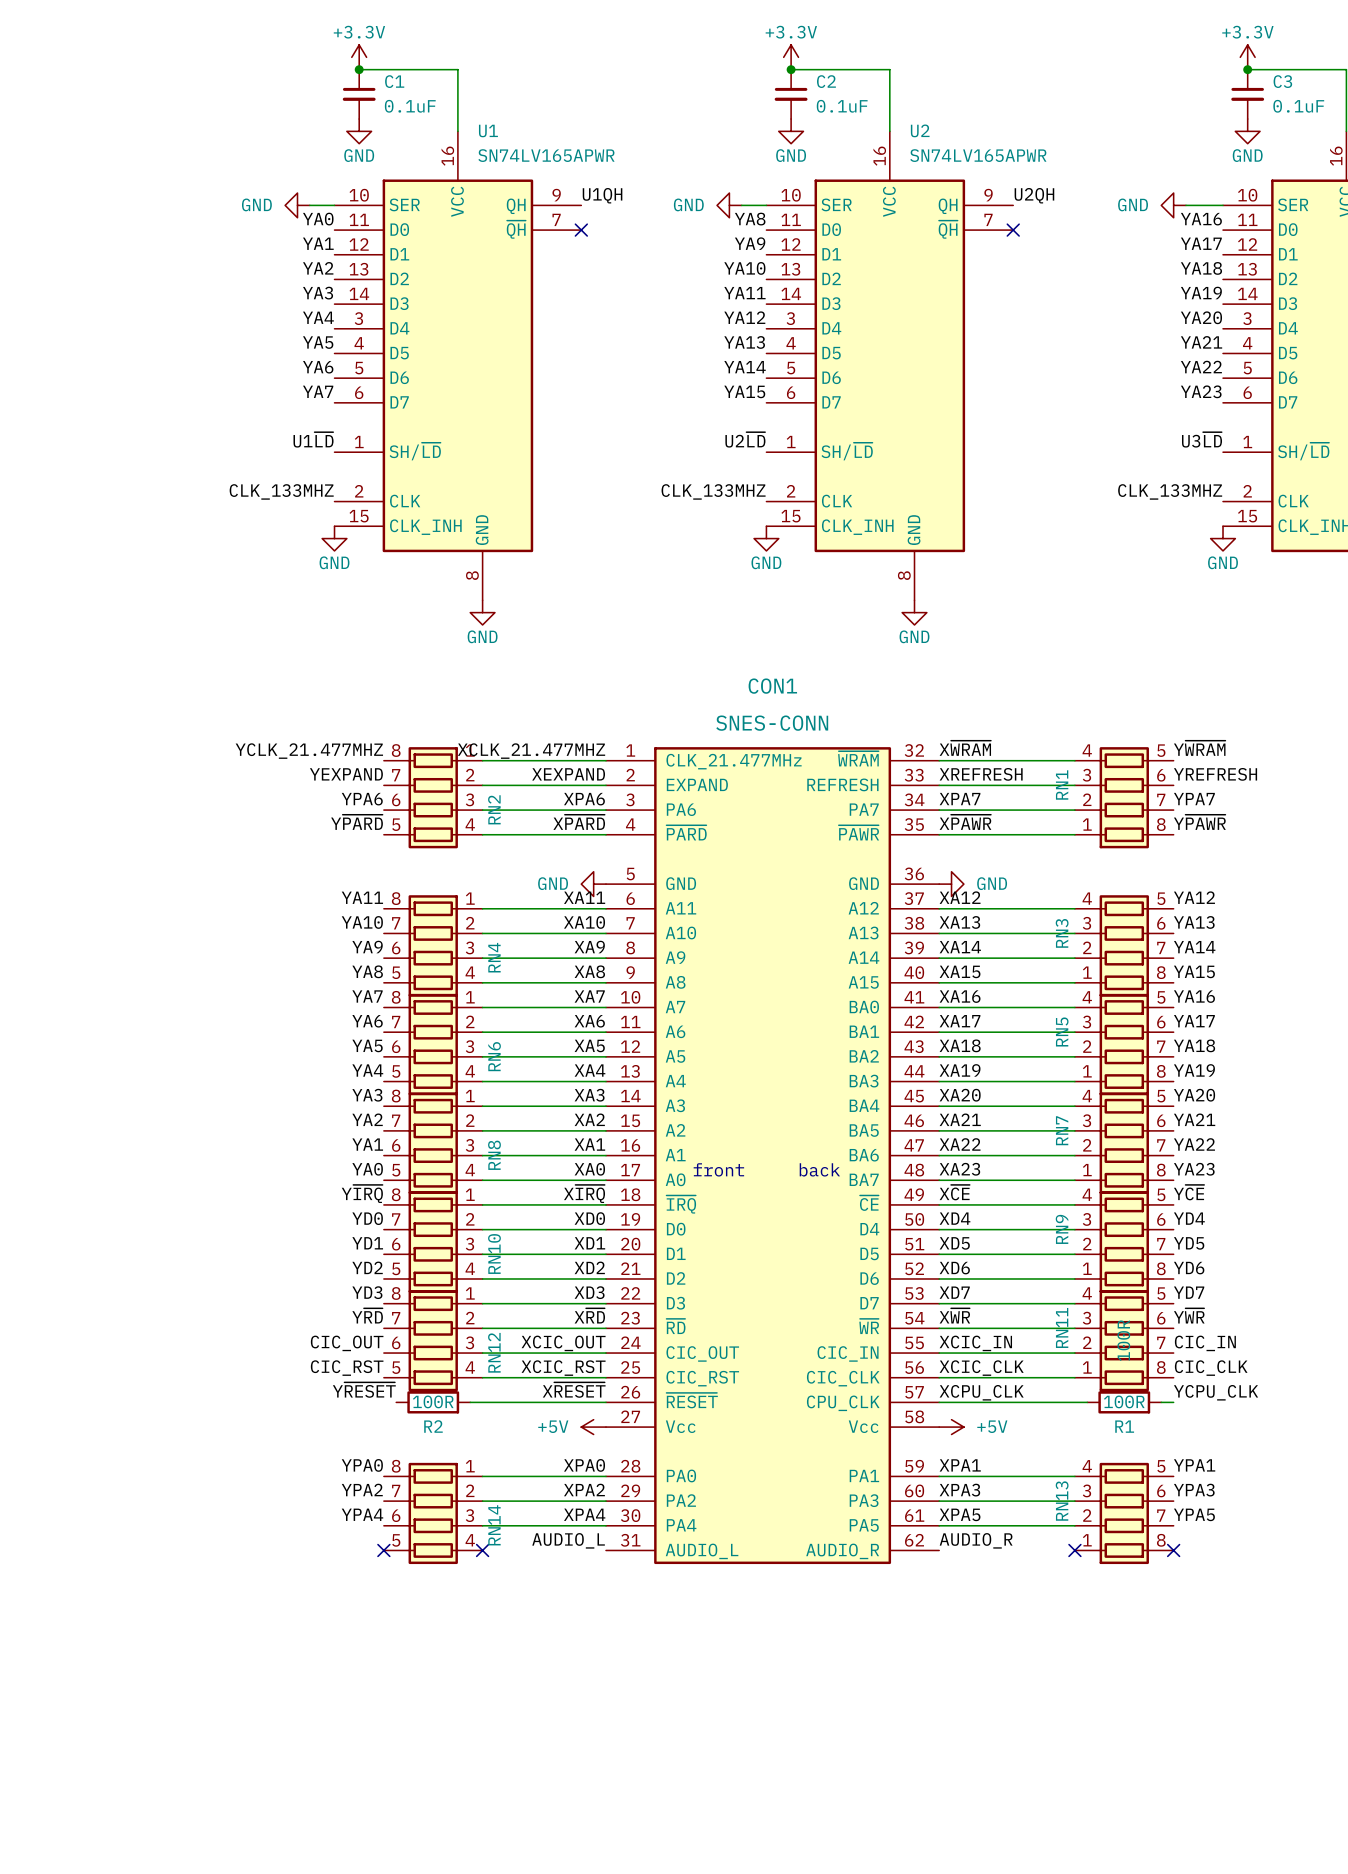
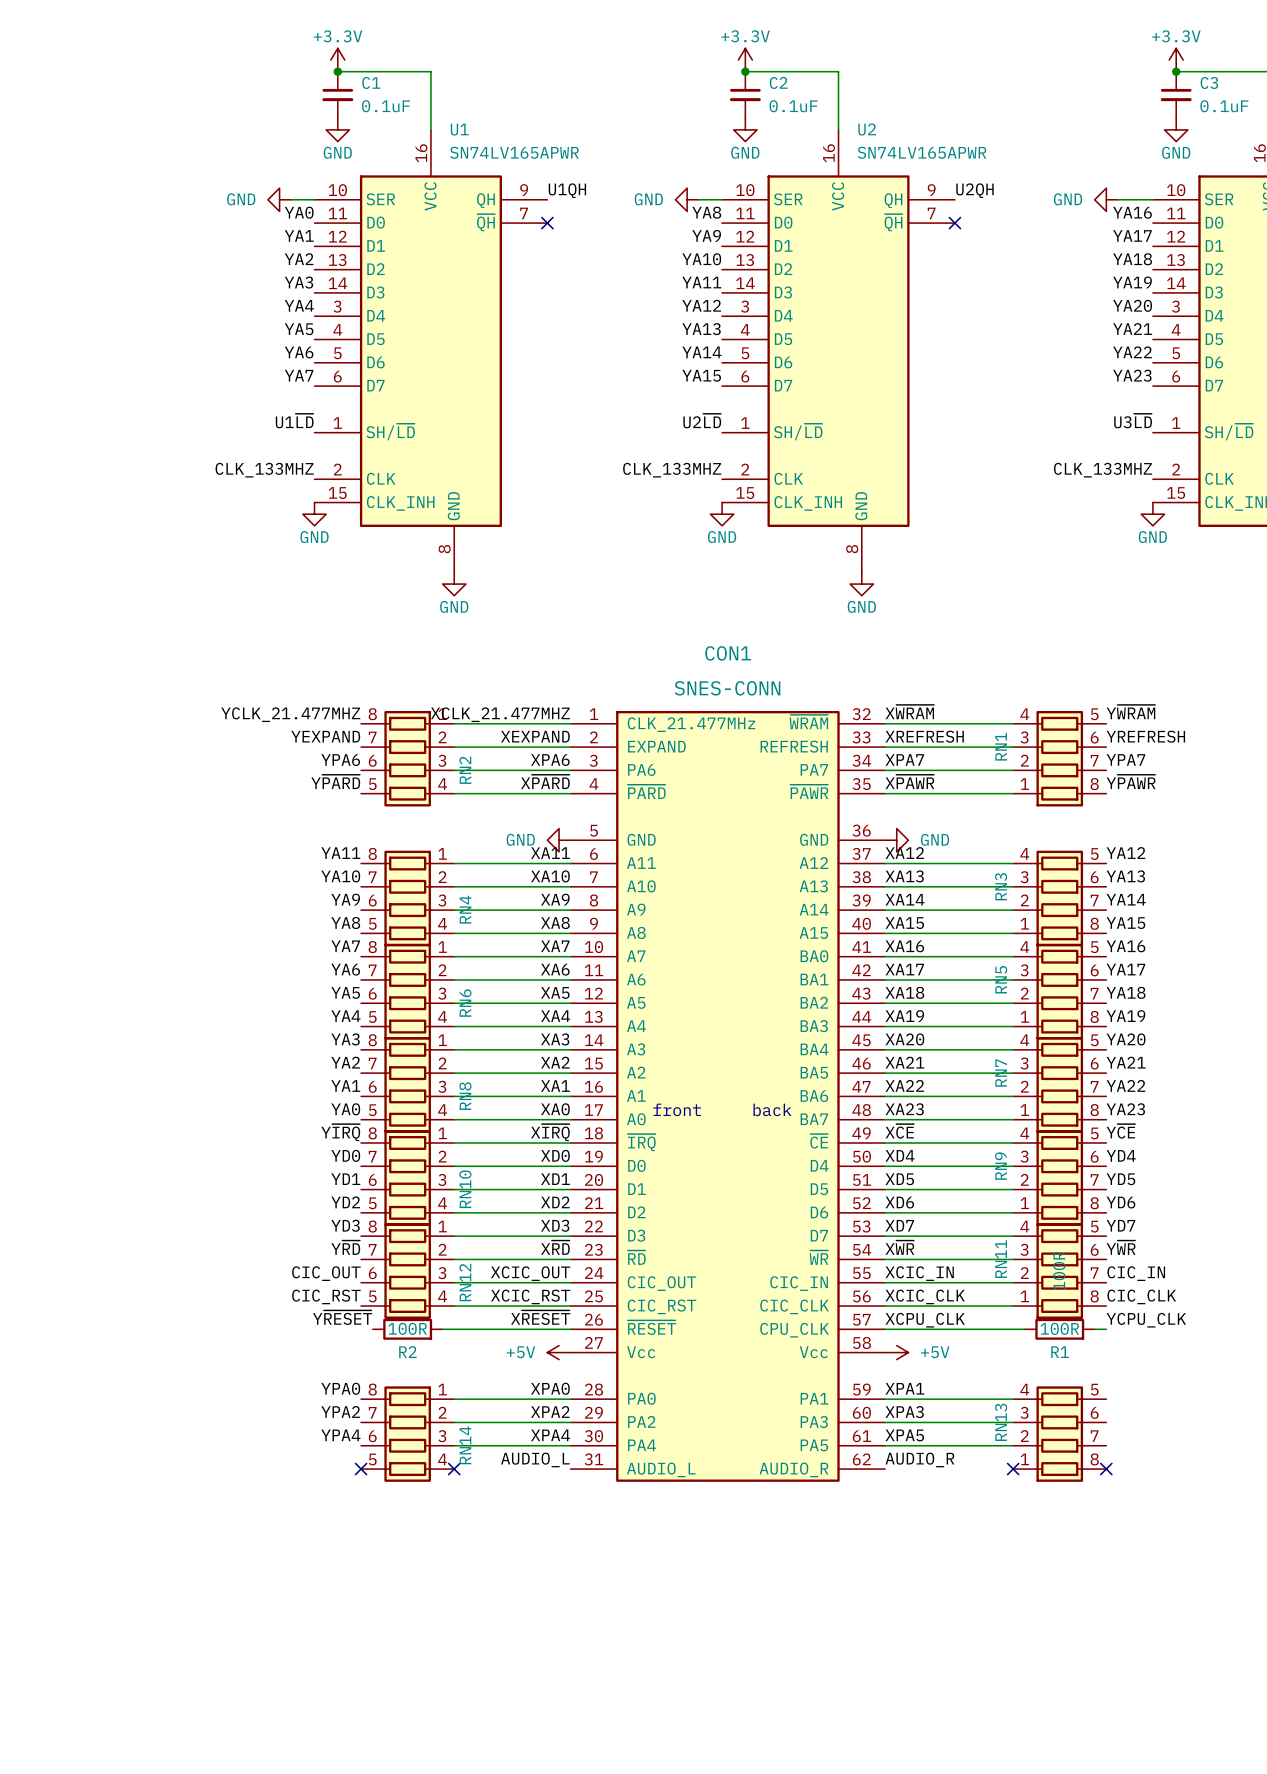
label: YPA1 (1194, 1465) -> none
label: YPA3 (1194, 1490) -> none
label: YPA5 (1194, 1514) -> none

